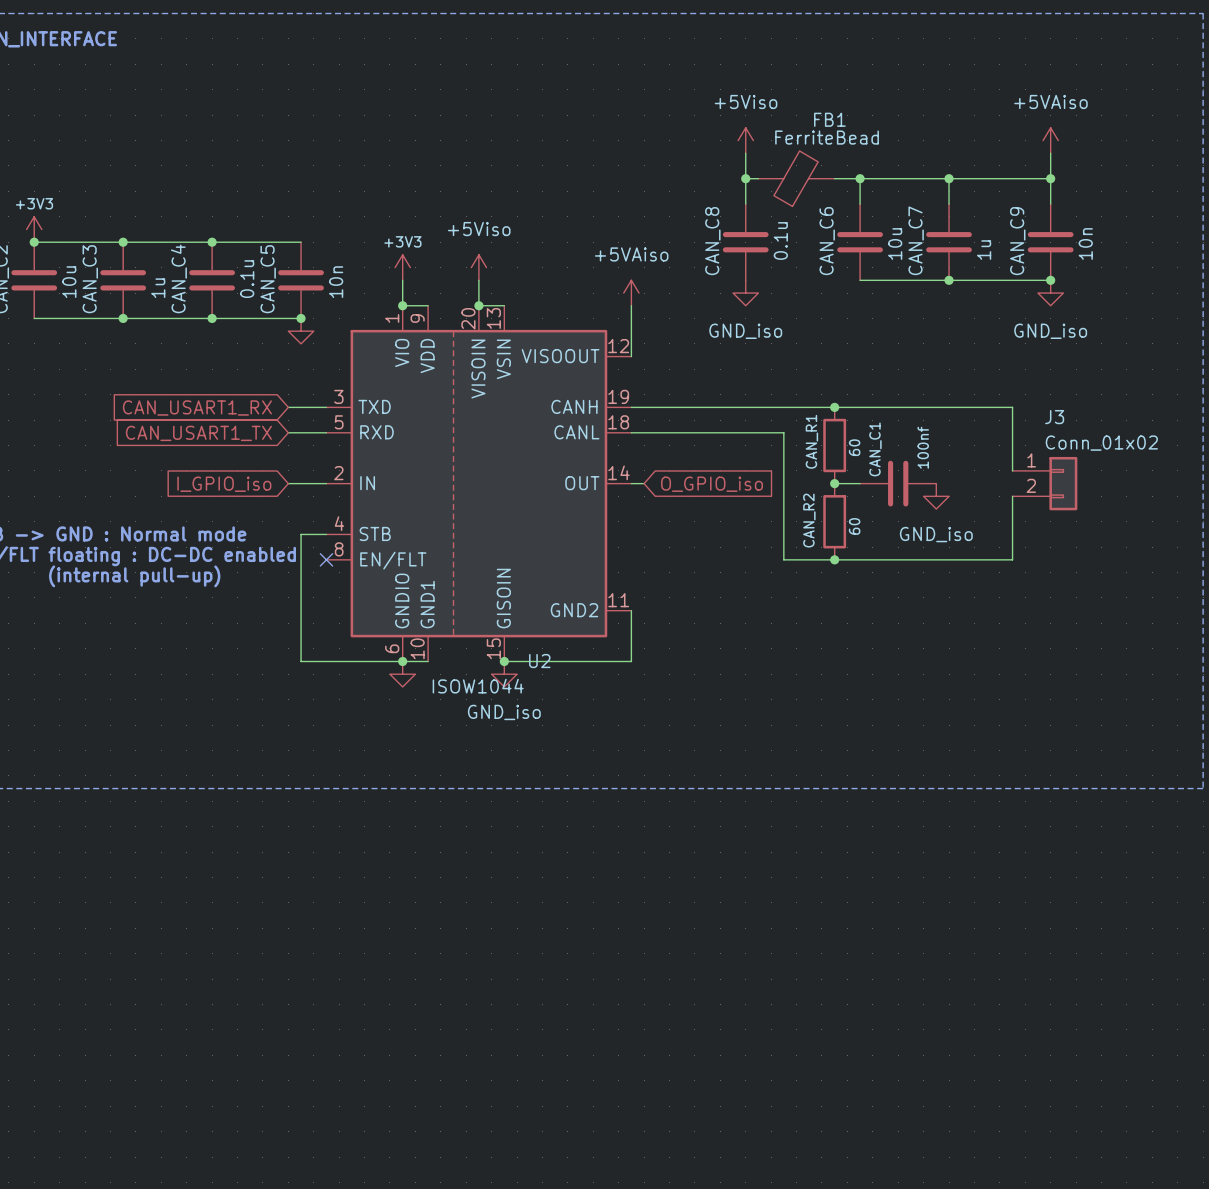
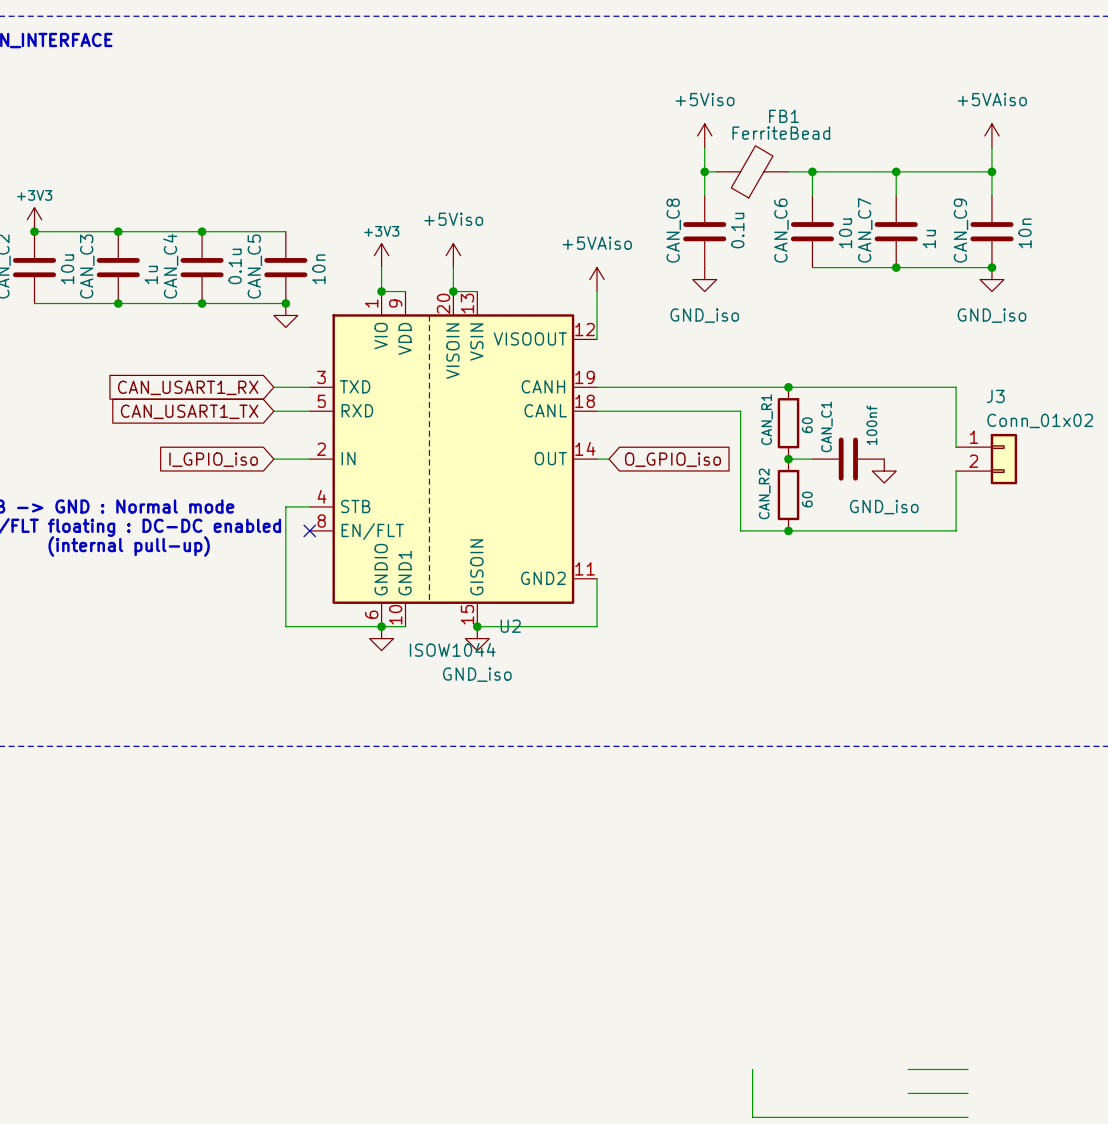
wire: none -> (752, 1069) (752, 1117) (968, 1117)
wire: none -> (908, 1069) (968, 1069)
wire: none -> (908, 1093) (968, 1093)

